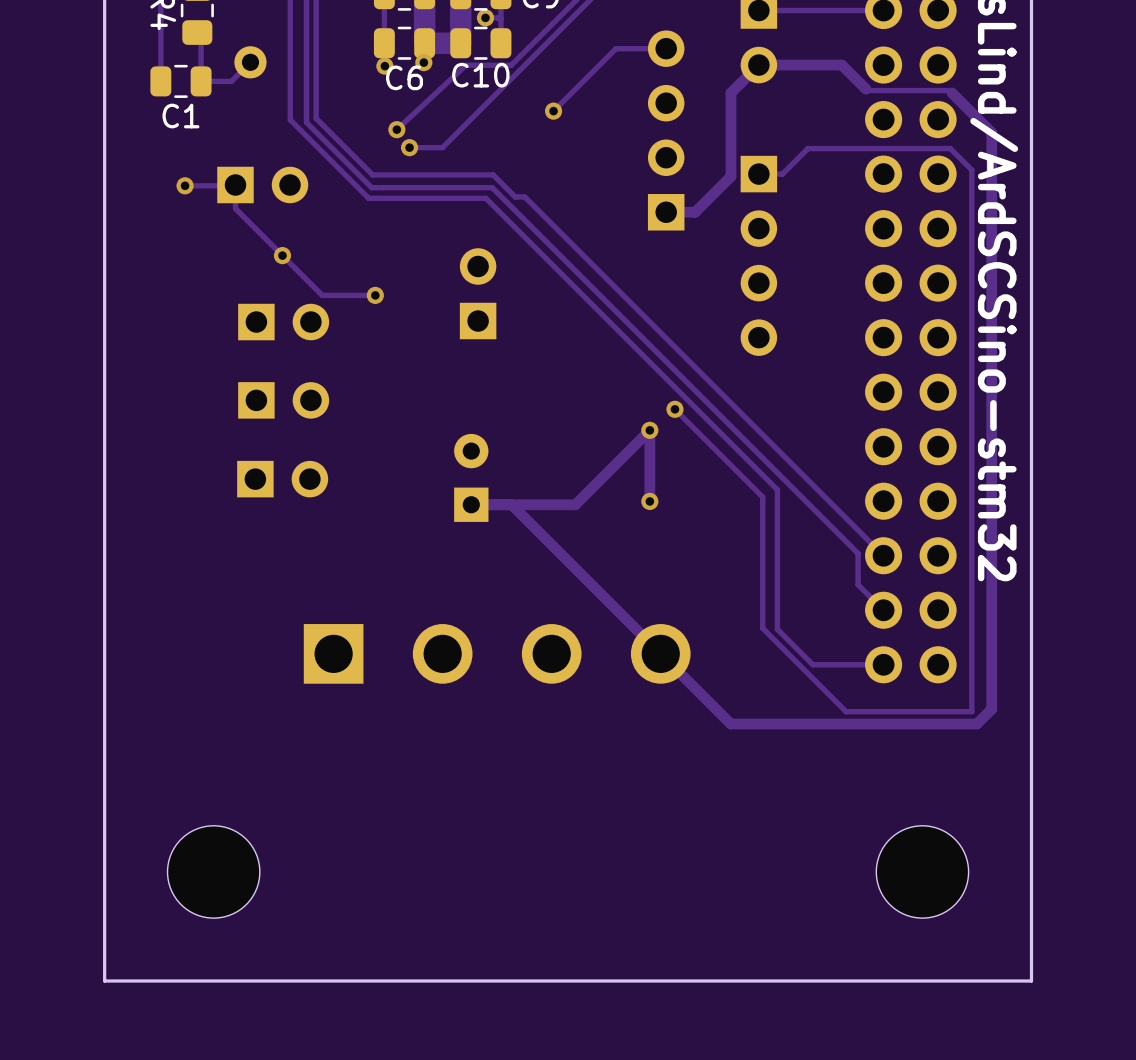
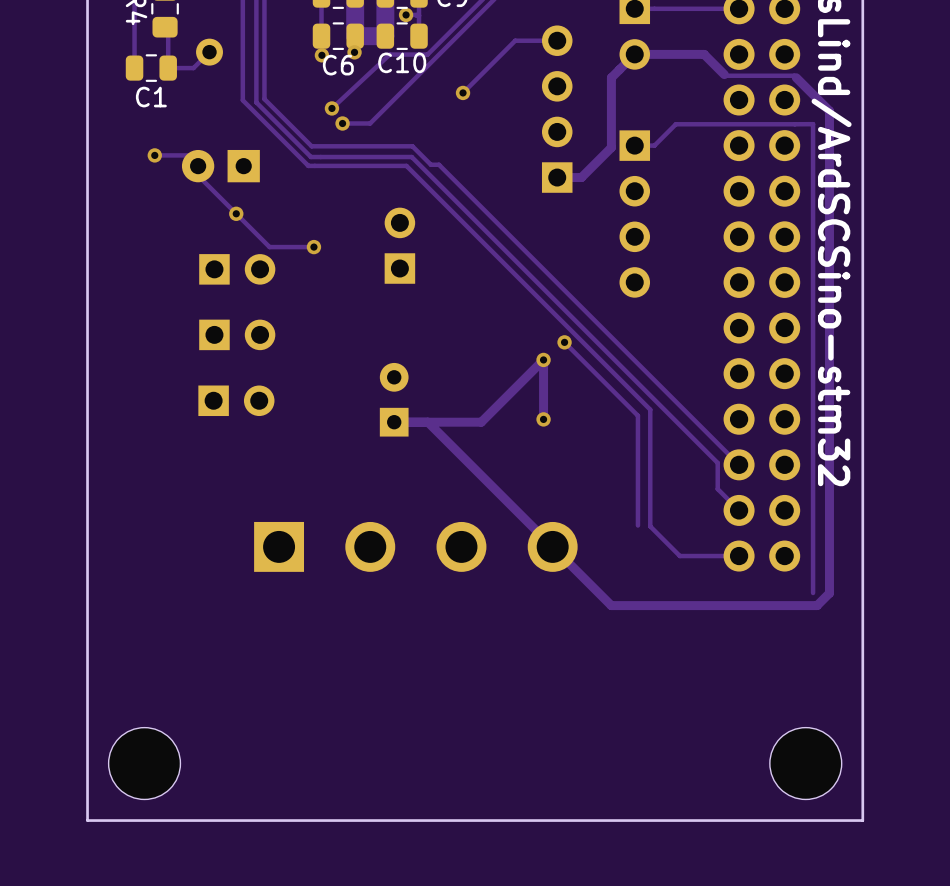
track: (950, 148) (971, 170) (971, 711) (846, 711) (762, 628) -> (794, 124) (813, 124) (813, 592)
part footprint: [217, 166, 309, 204] -> [181, 149, 260, 183]
part: (213, 871) -> none
part: (922, 871) -> none
part: none -> (144, 763)
part: none -> (805, 763)

